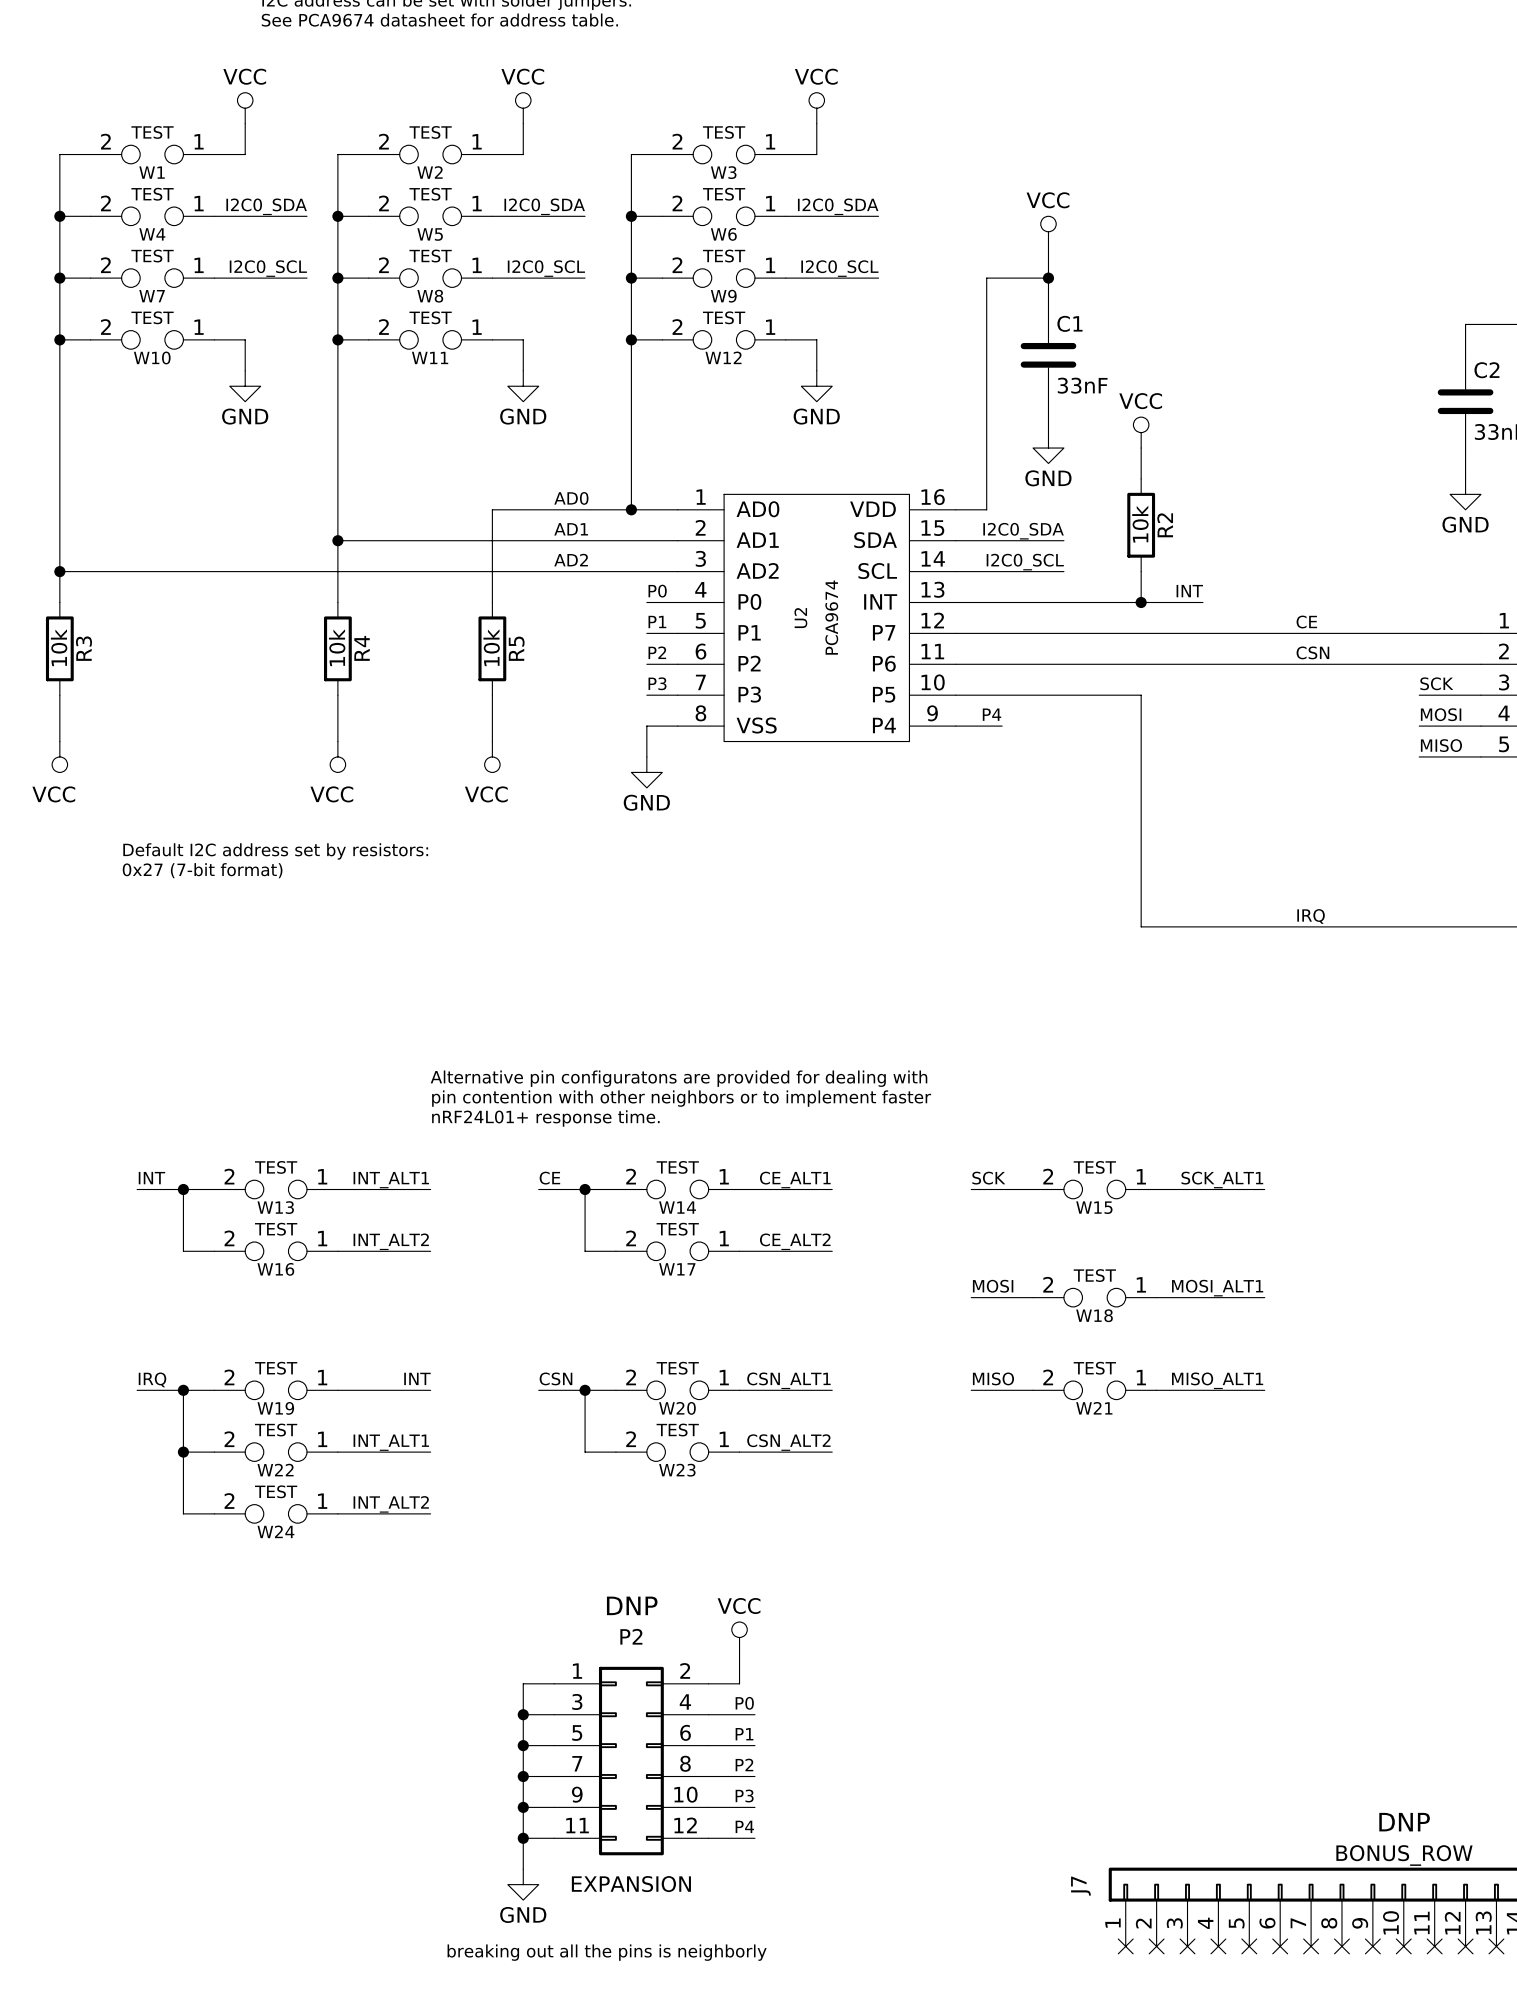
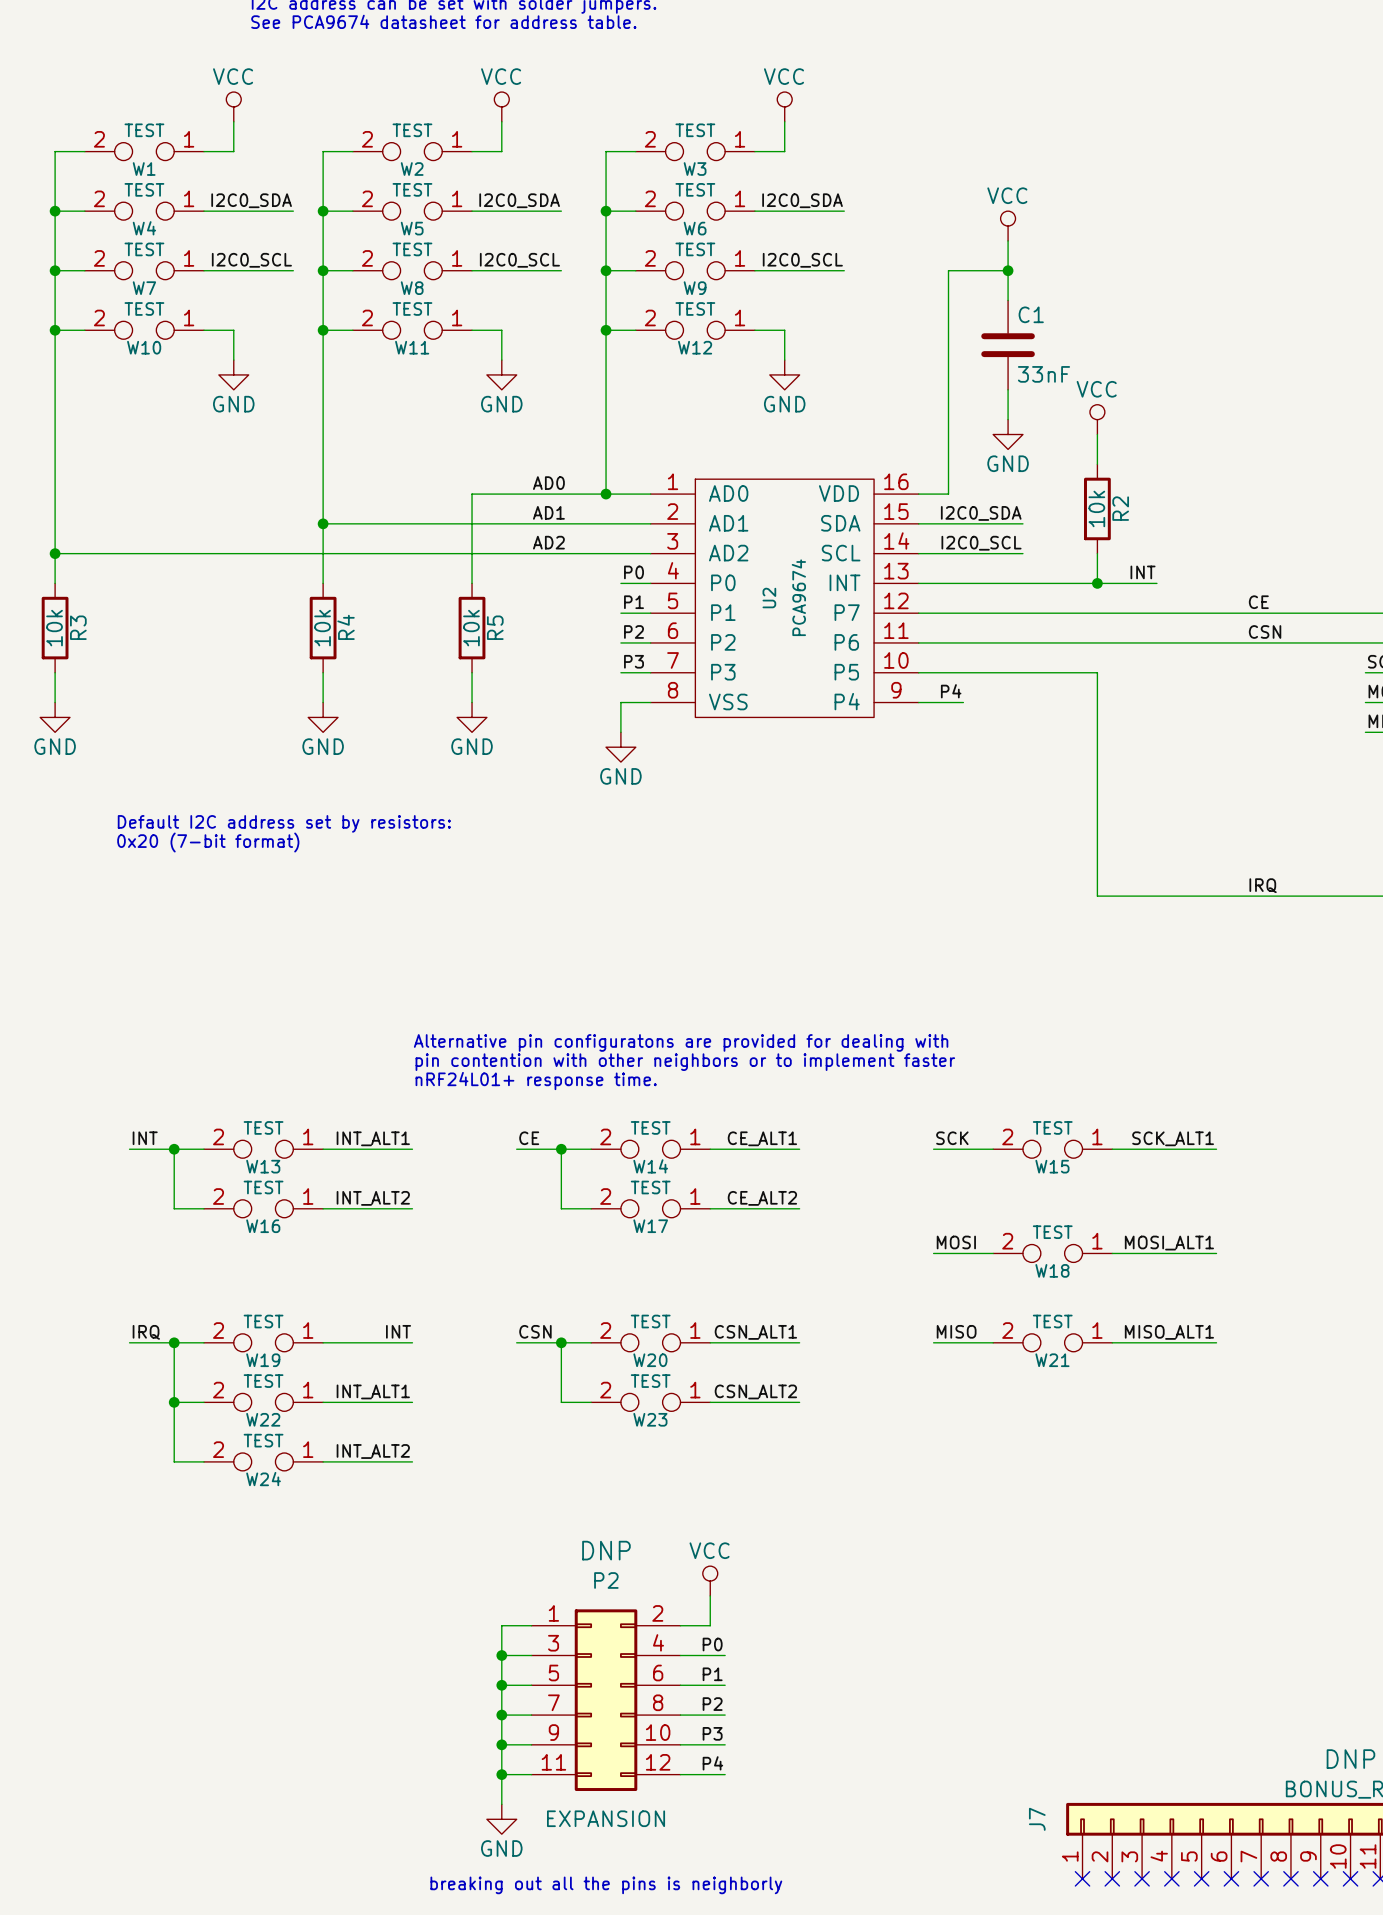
power symbol: none -> GND (55, 717)
power symbol: none -> GND (323, 717)
power symbol: none -> GND (472, 717)
power symbol: VCC (59, 756) -> none
power symbol: VCC (337, 756) -> none
power symbol: VCC (492, 756) -> none
text: 0x27 (7-bit format) (202, 870) -> 0x20 (7-bit format) (208, 842)

